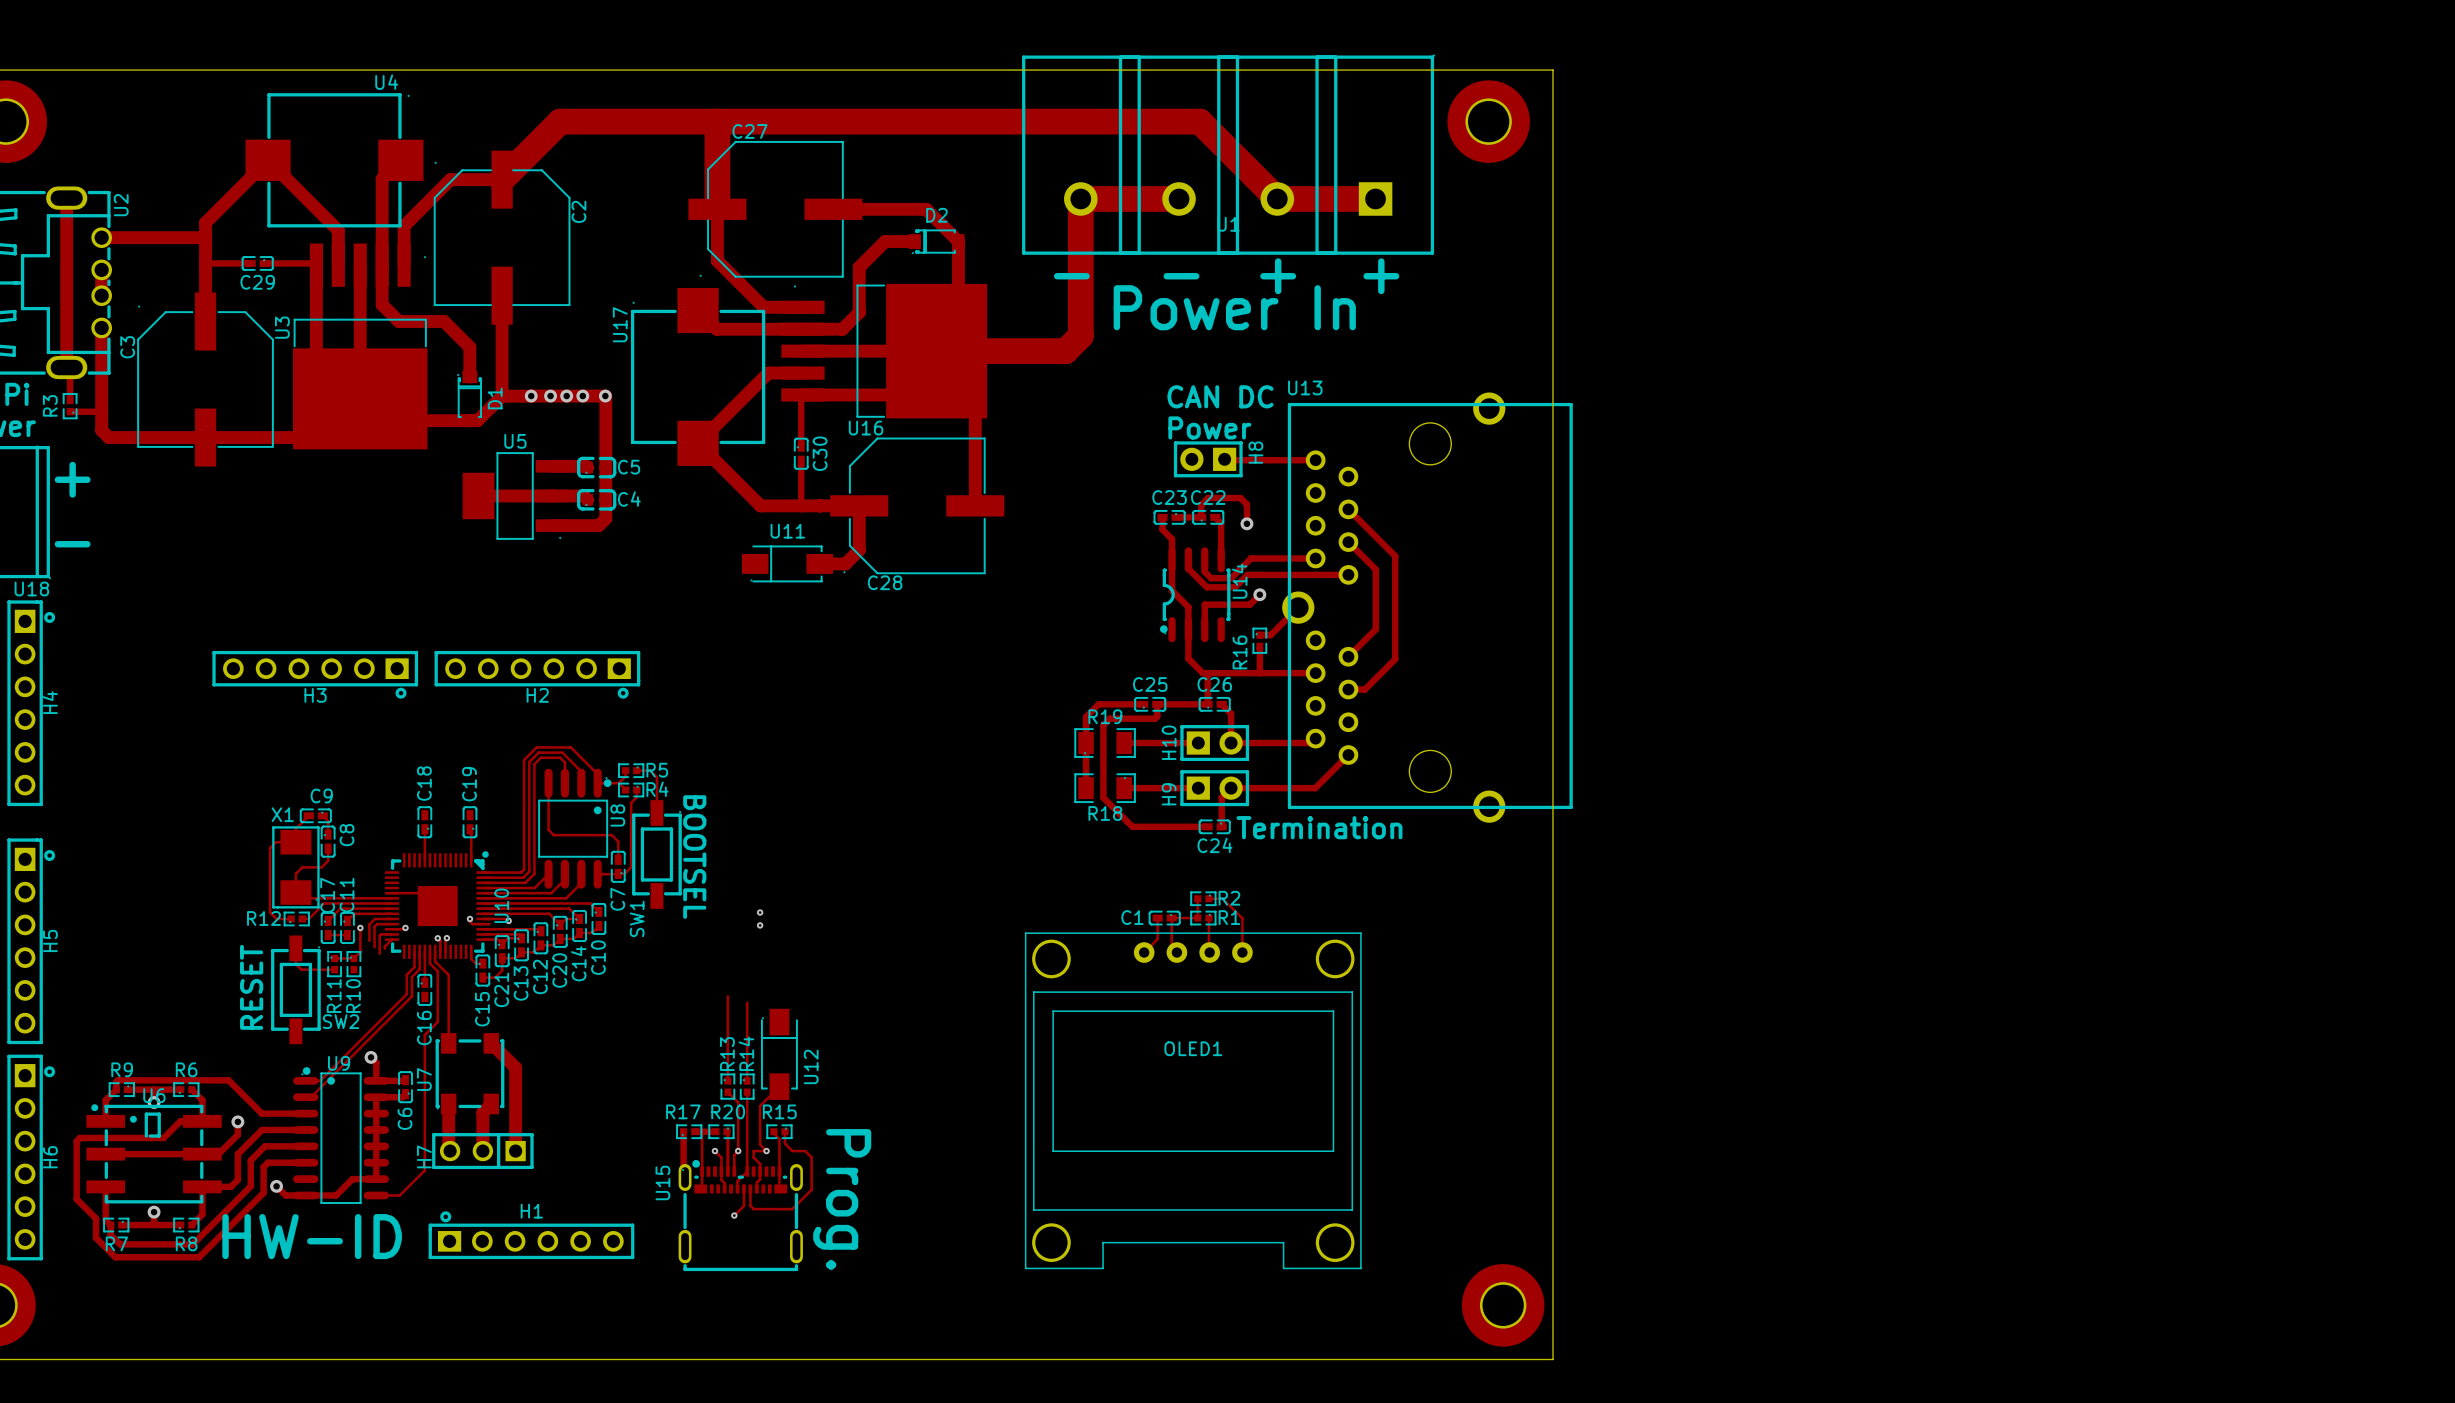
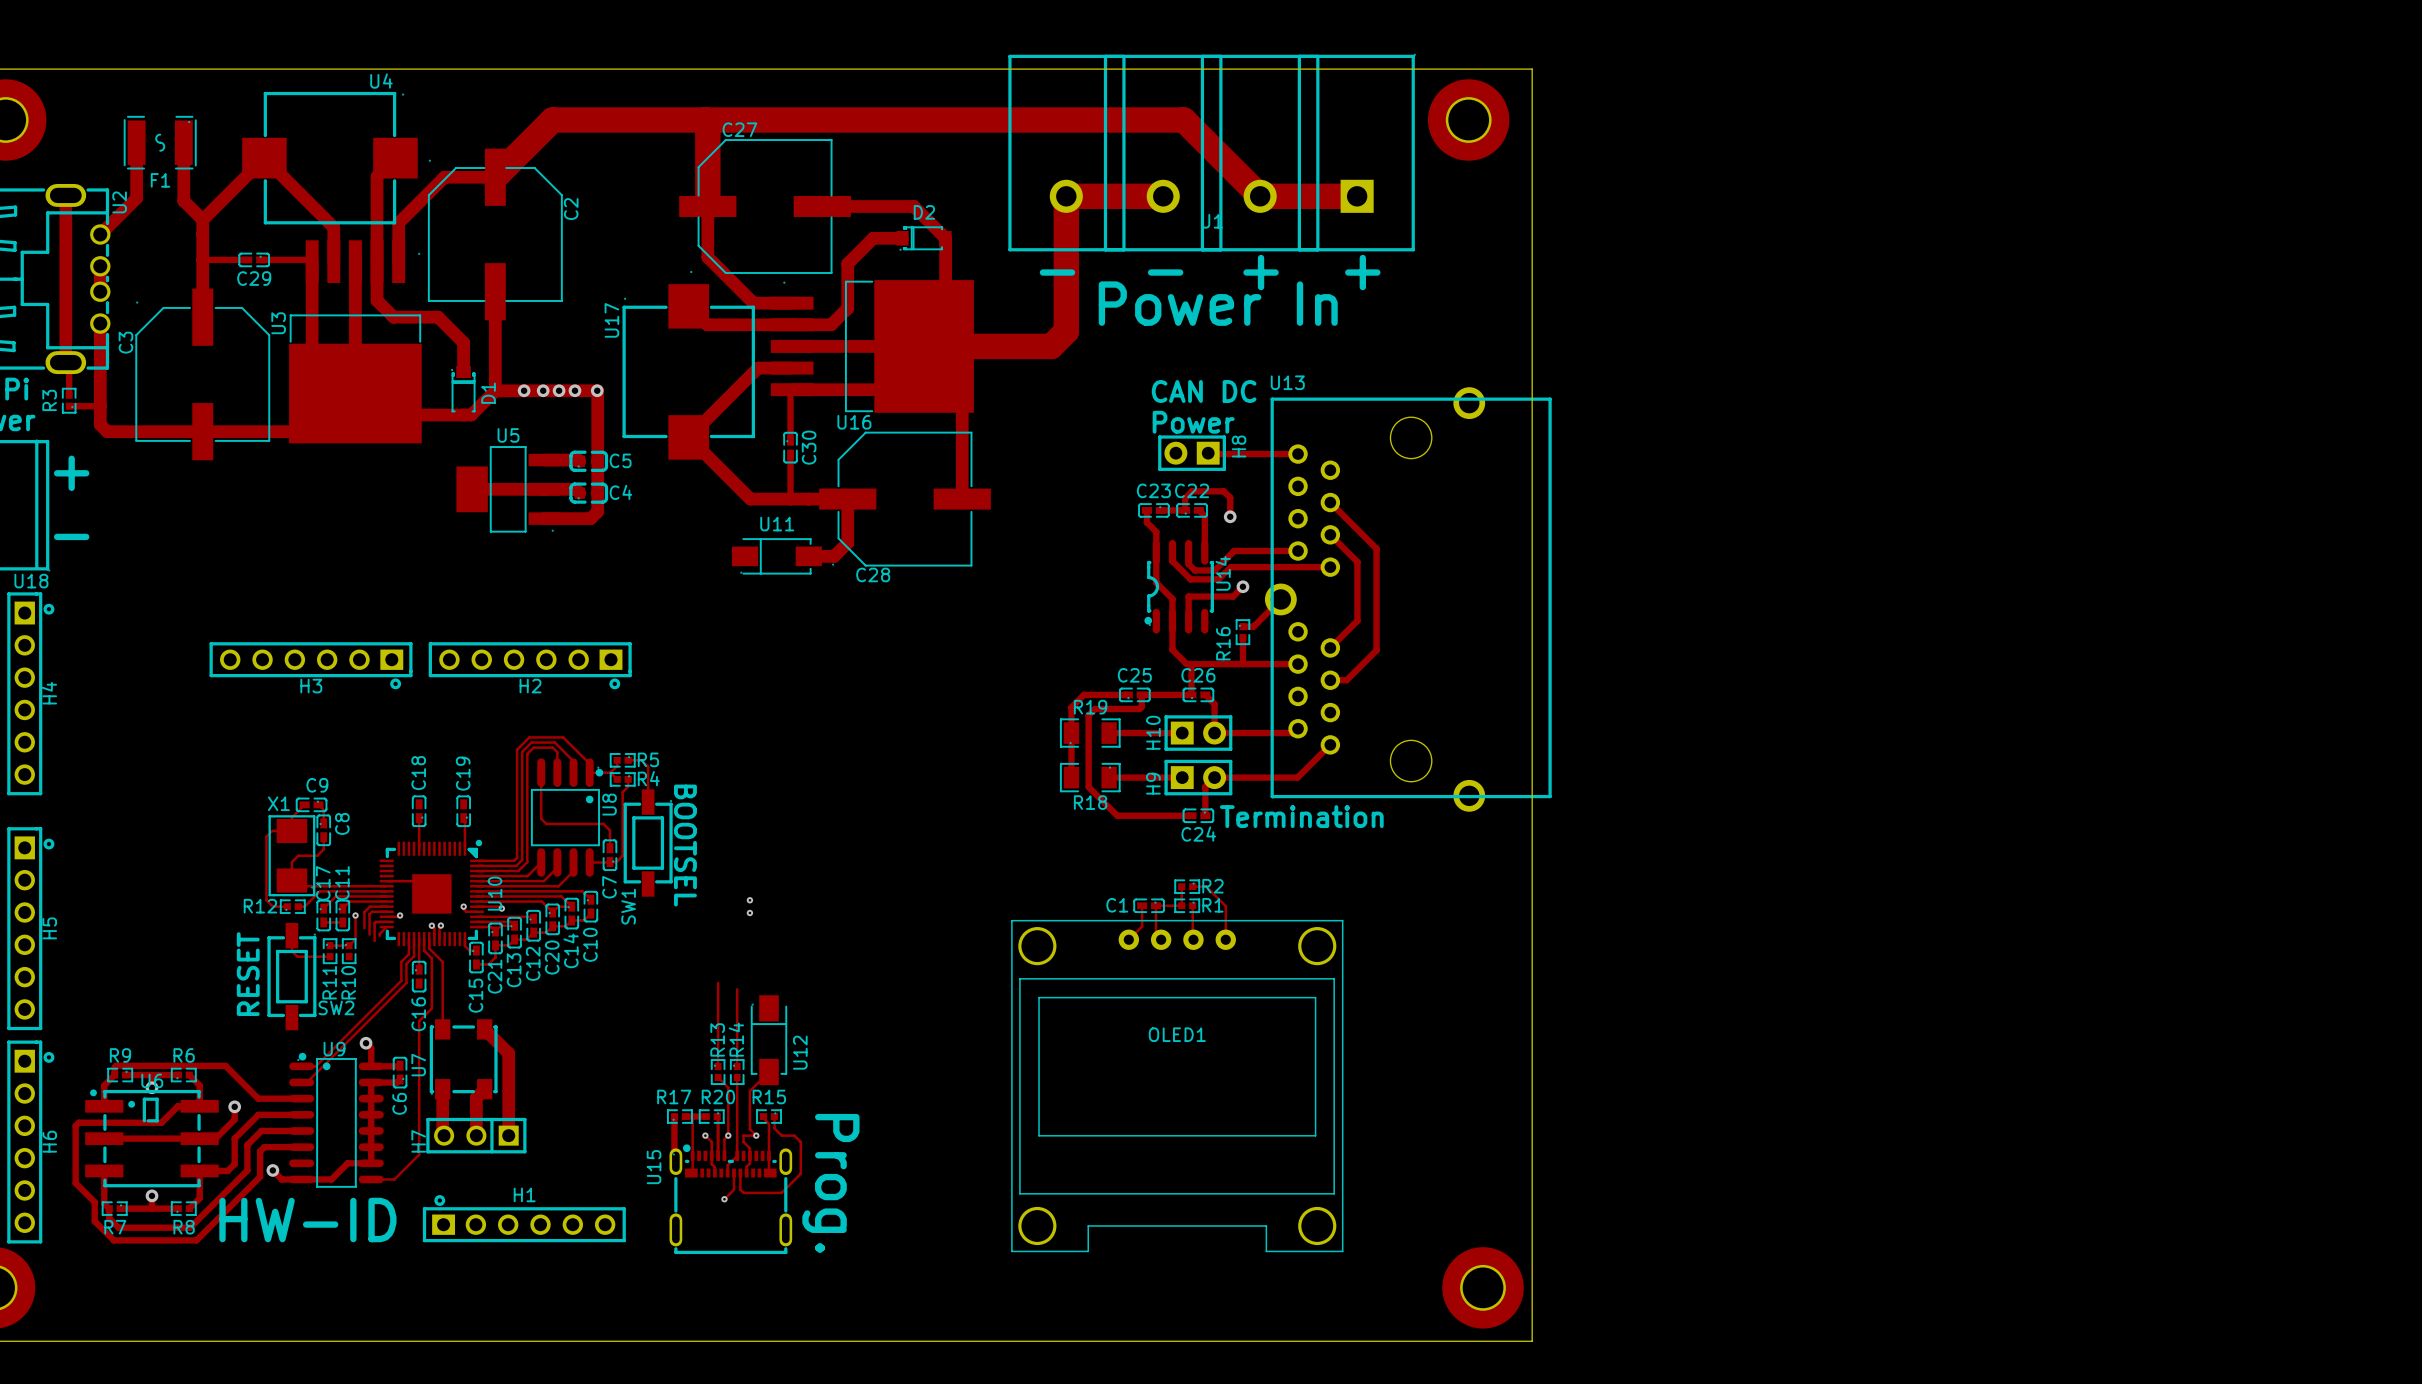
F1: none -> (160, 142)
track: none -> (183, 142) (183, 200) (202, 219)
track: (101, 237) (205, 237) -> (100, 234) (136, 198) (136, 142)

